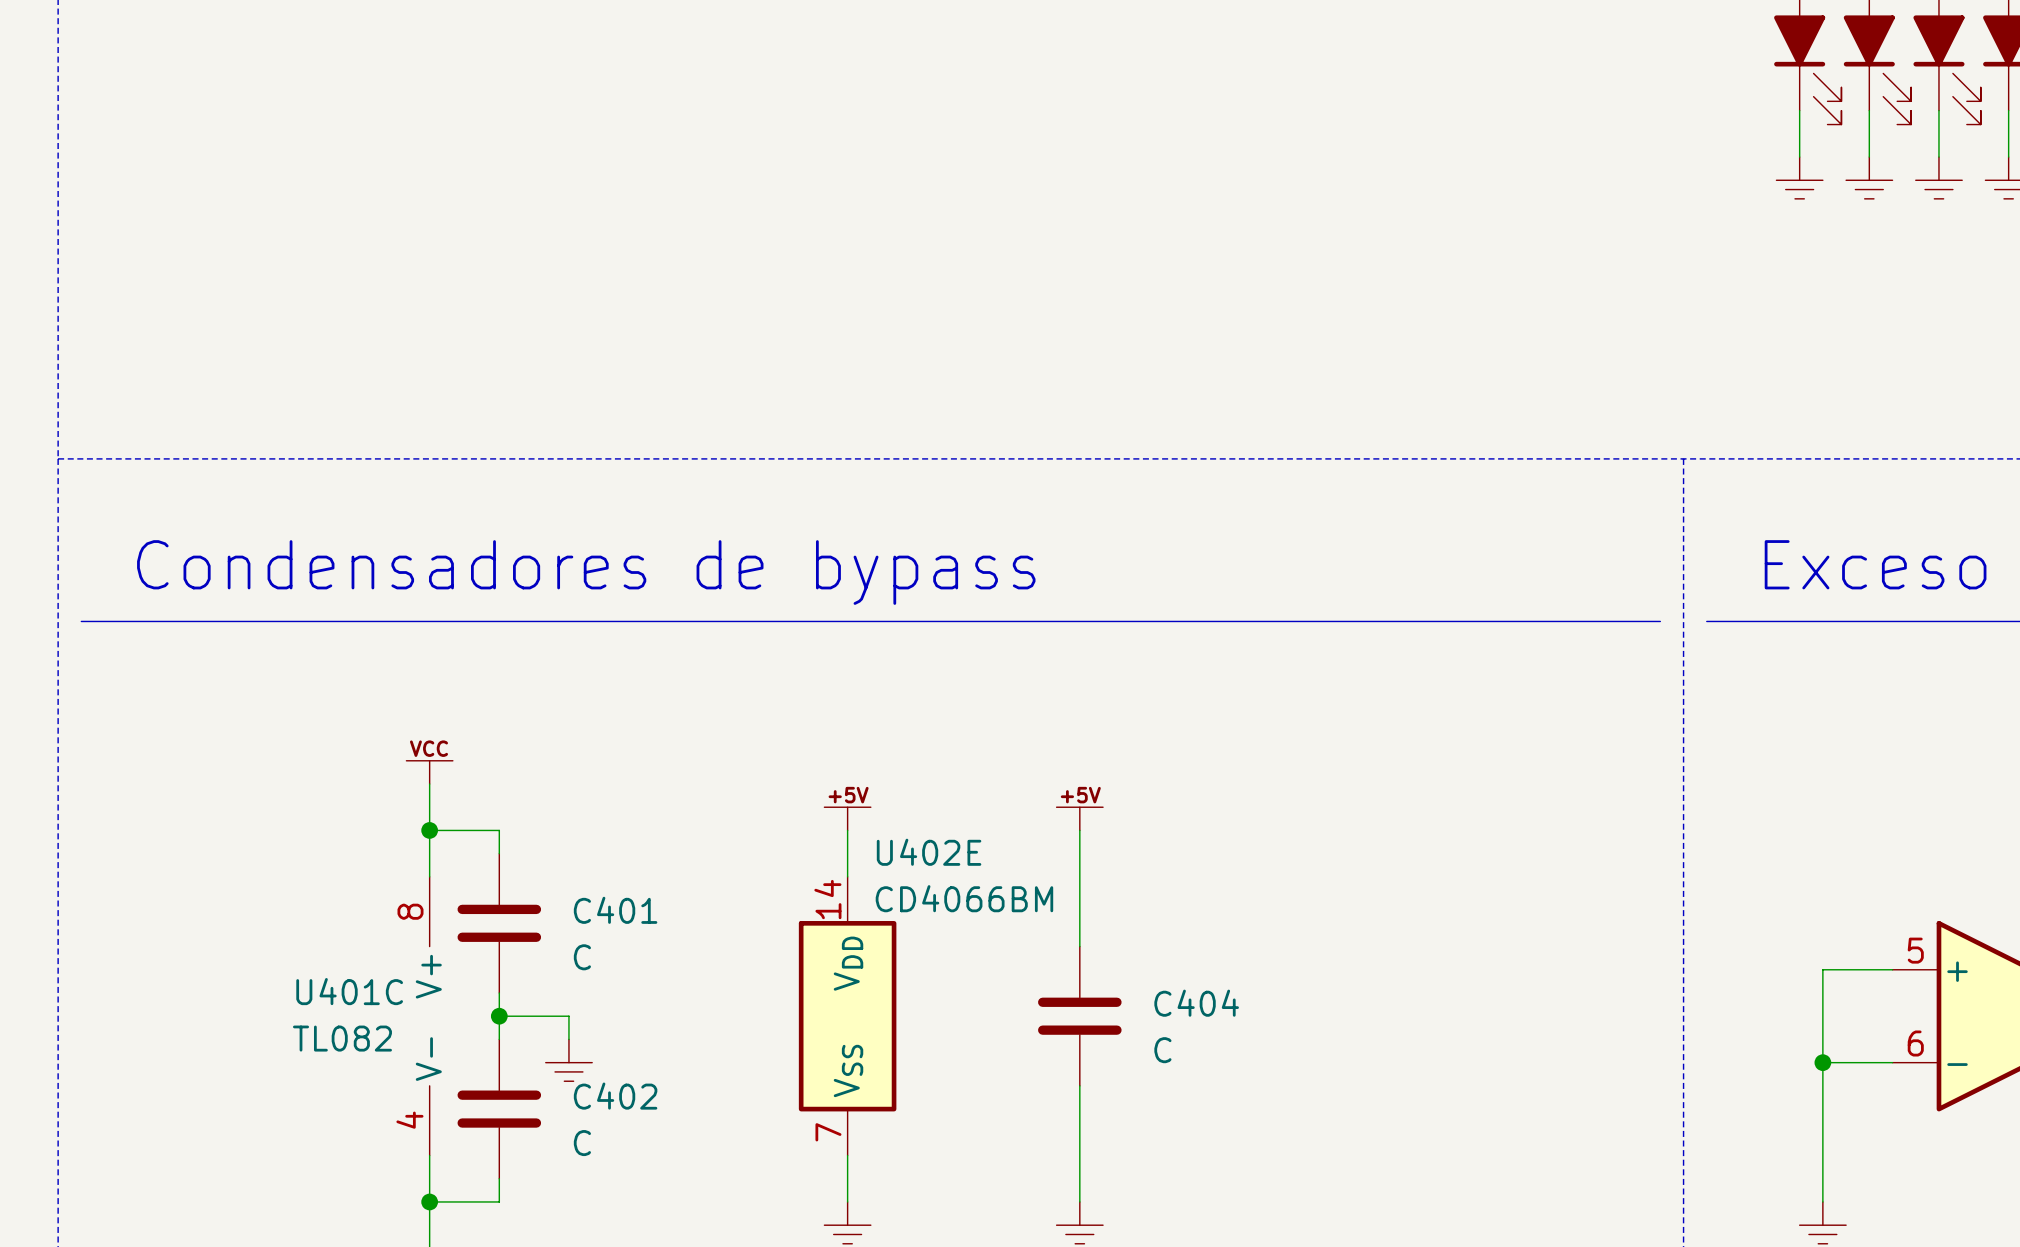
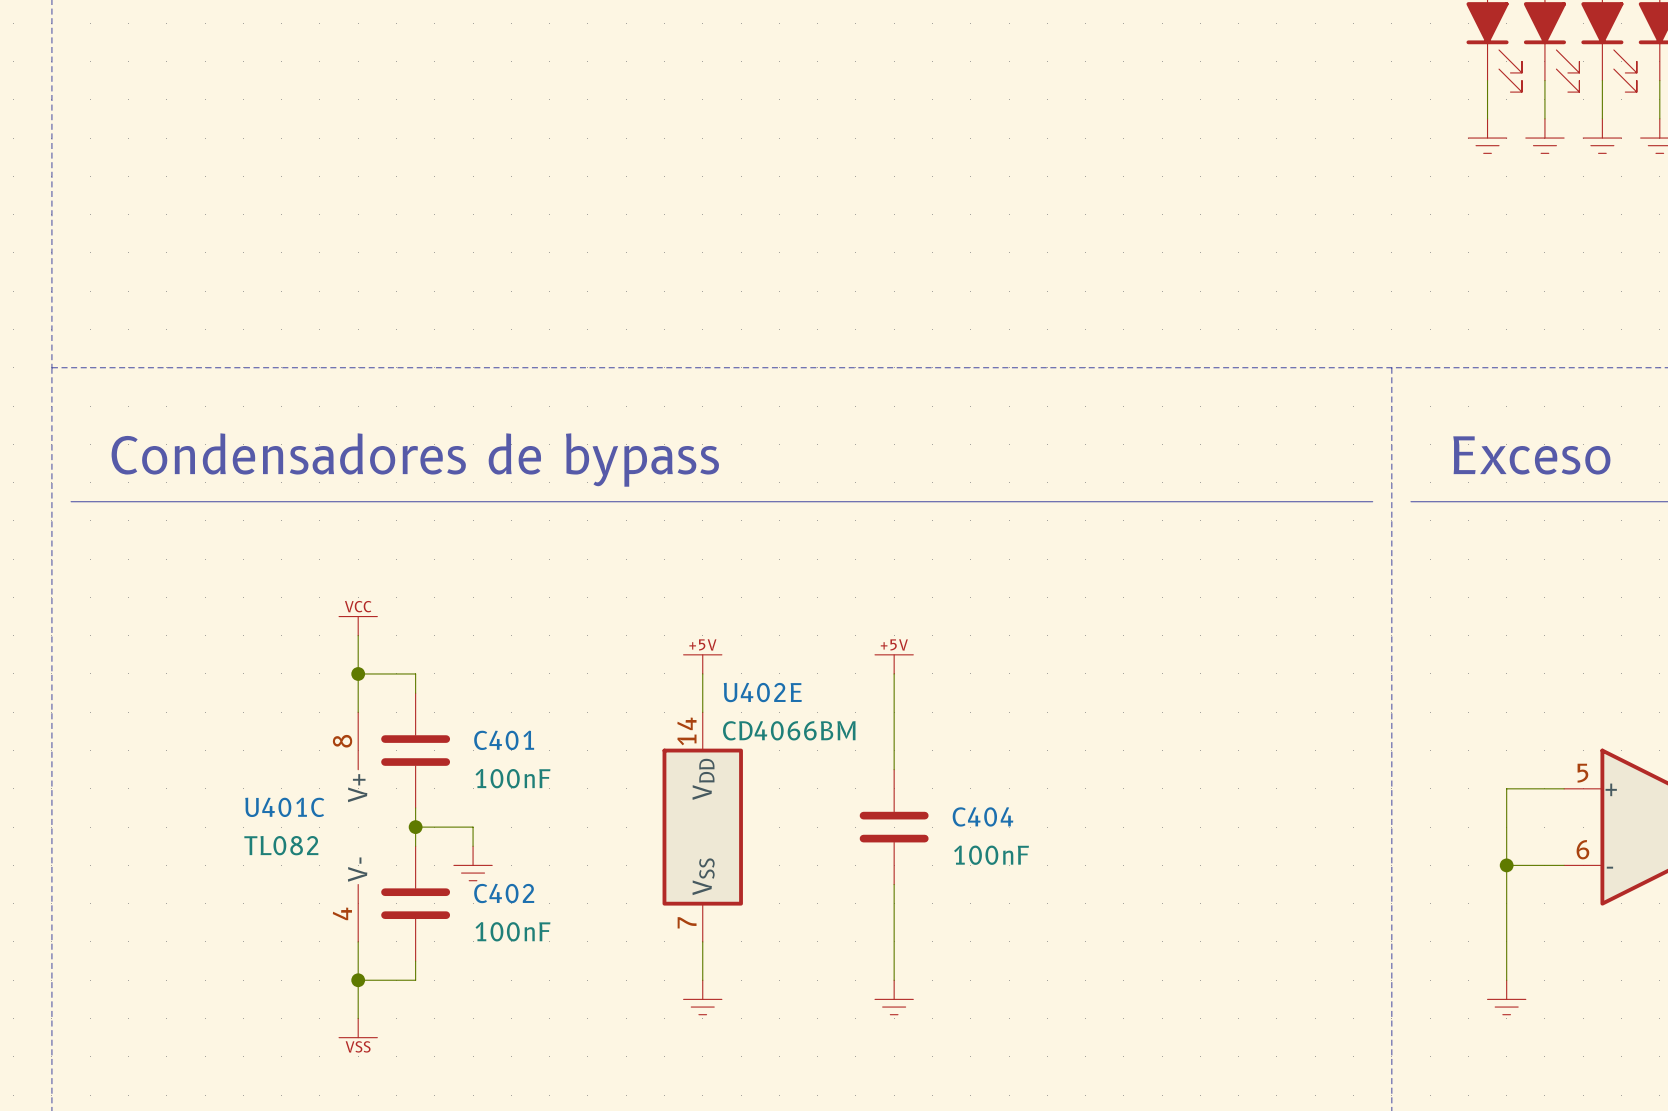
C401 value: C (582, 957) -> 100nF (512, 778)
C404 value: C (1162, 1050) -> 100nF (991, 855)
C402 value: C (582, 1143) -> 100nF (512, 931)

